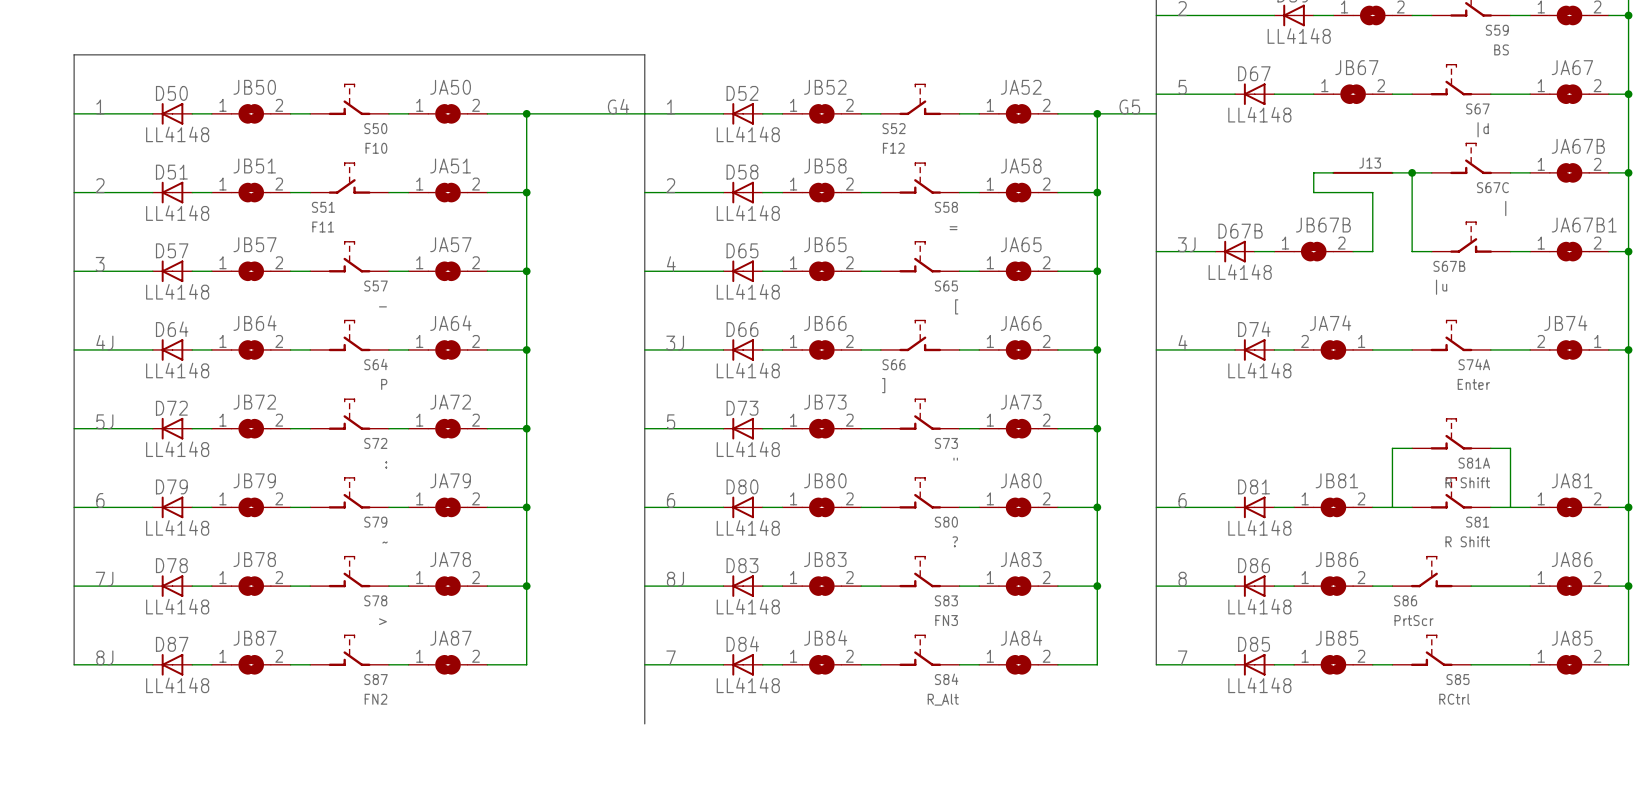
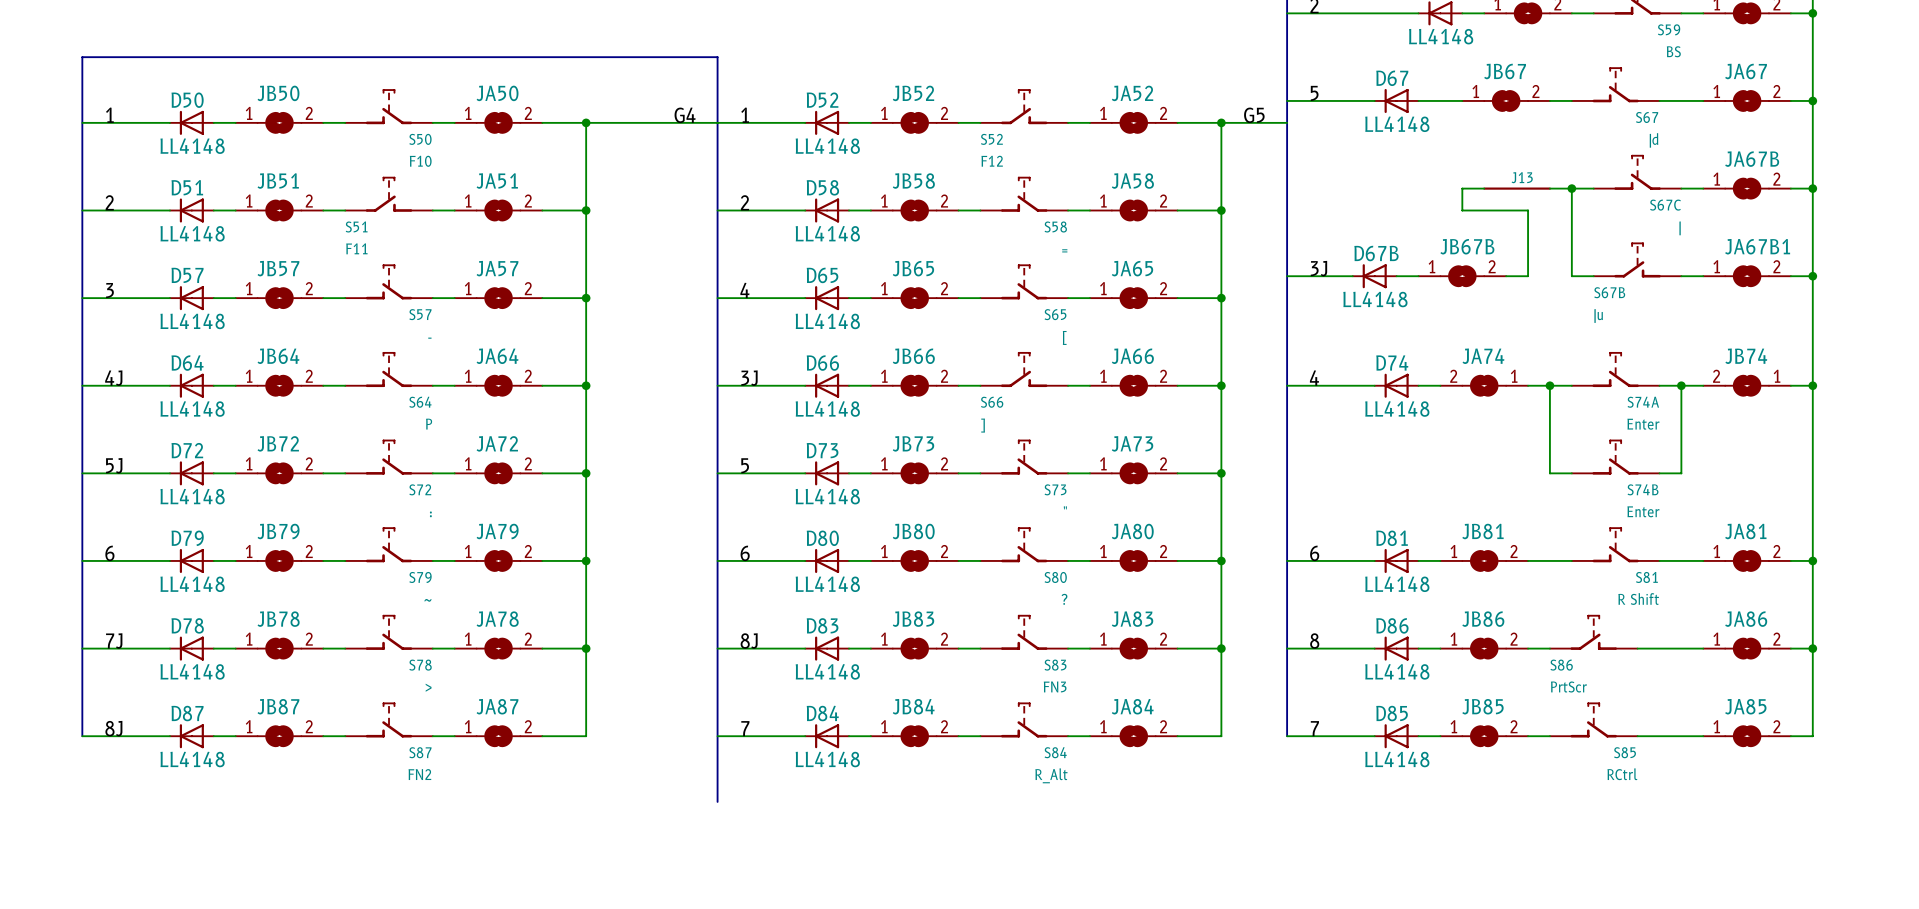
wire: none -> (1549, 385) (1549, 473) (1571, 473)
junction: none -> (1549, 385)
wire: none -> (1681, 385) (1681, 473) (1659, 473)
junction: none -> (1681, 385)
S74B: none -> Enter (1615, 457)
S81A: R Shift (1451, 433) -> none
wire: (1412, 448) (1392, 448) (1392, 507) -> none
wire: (1490, 448) (1510, 448) (1510, 507) -> none

